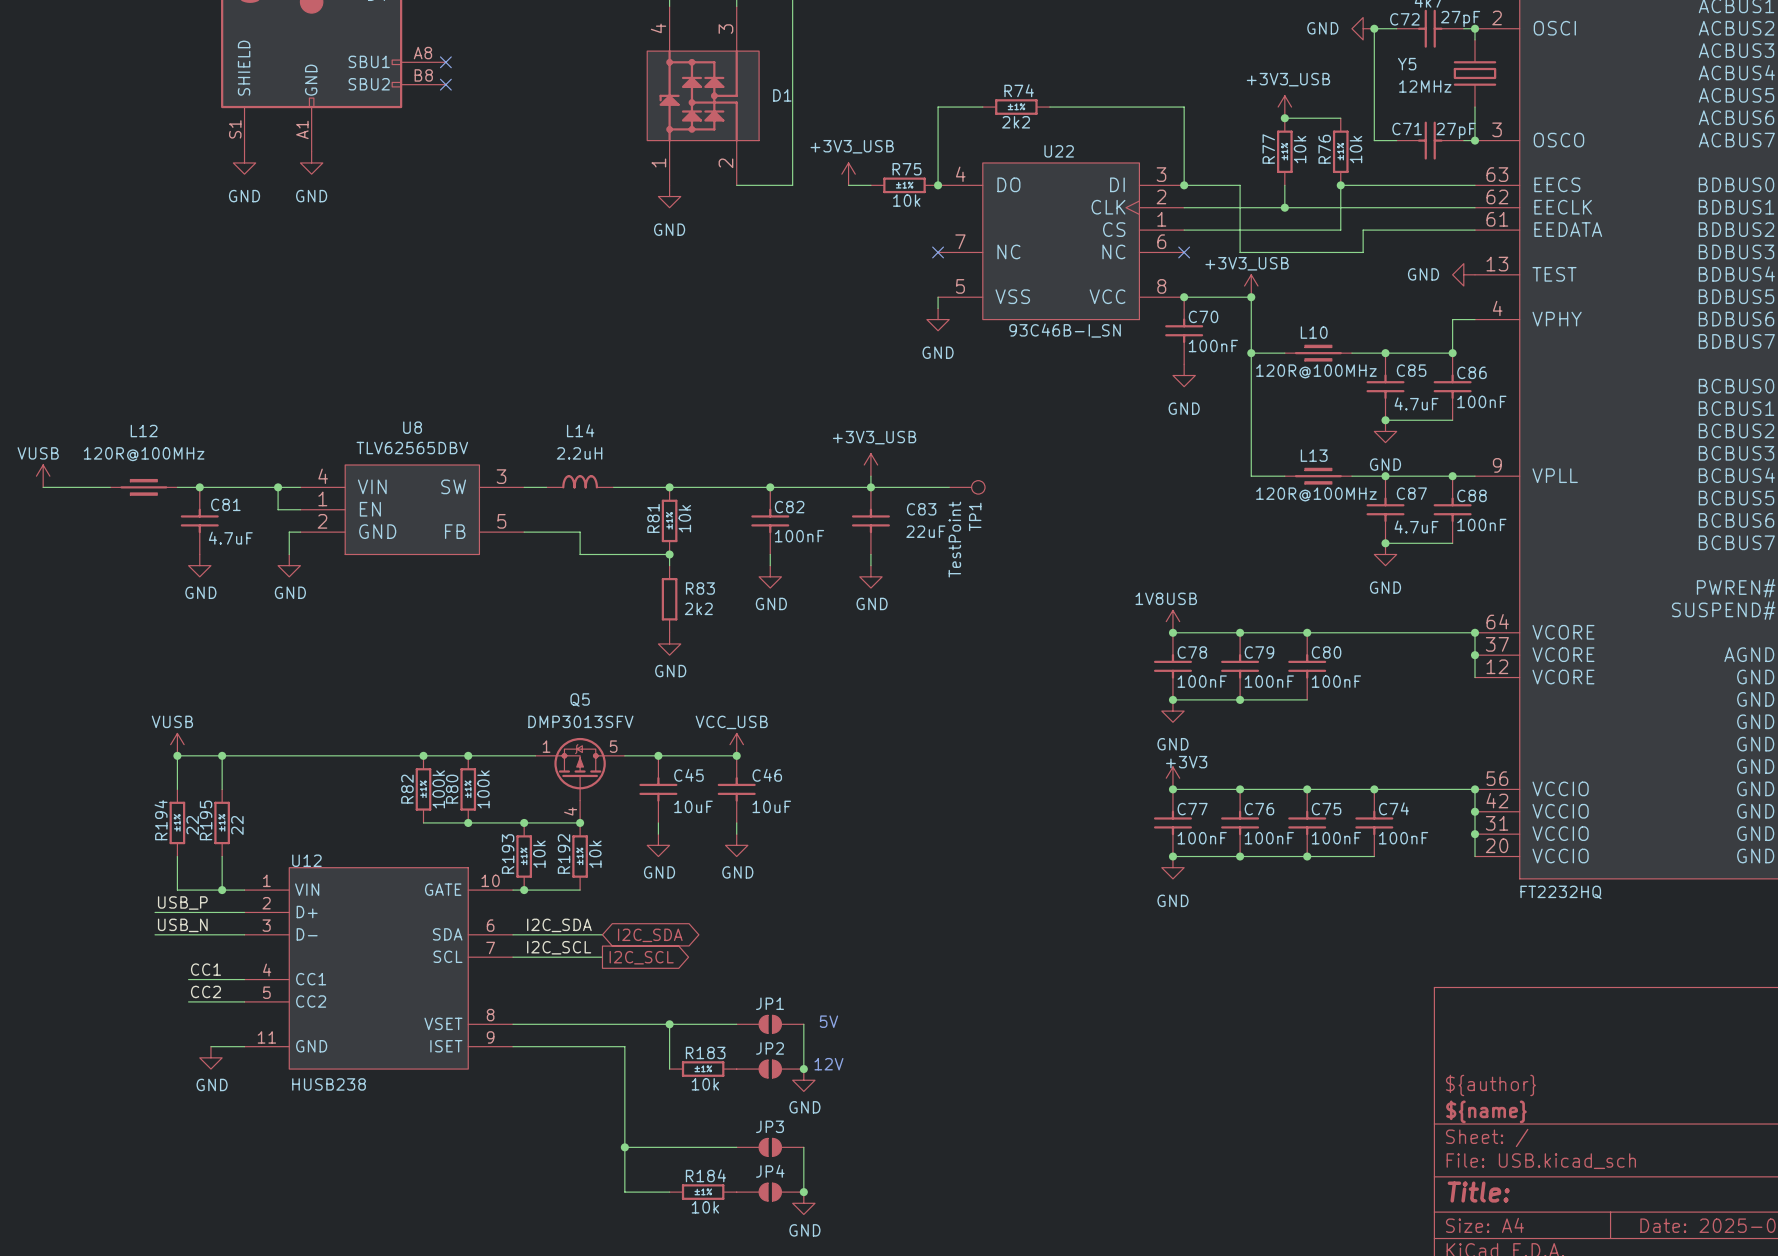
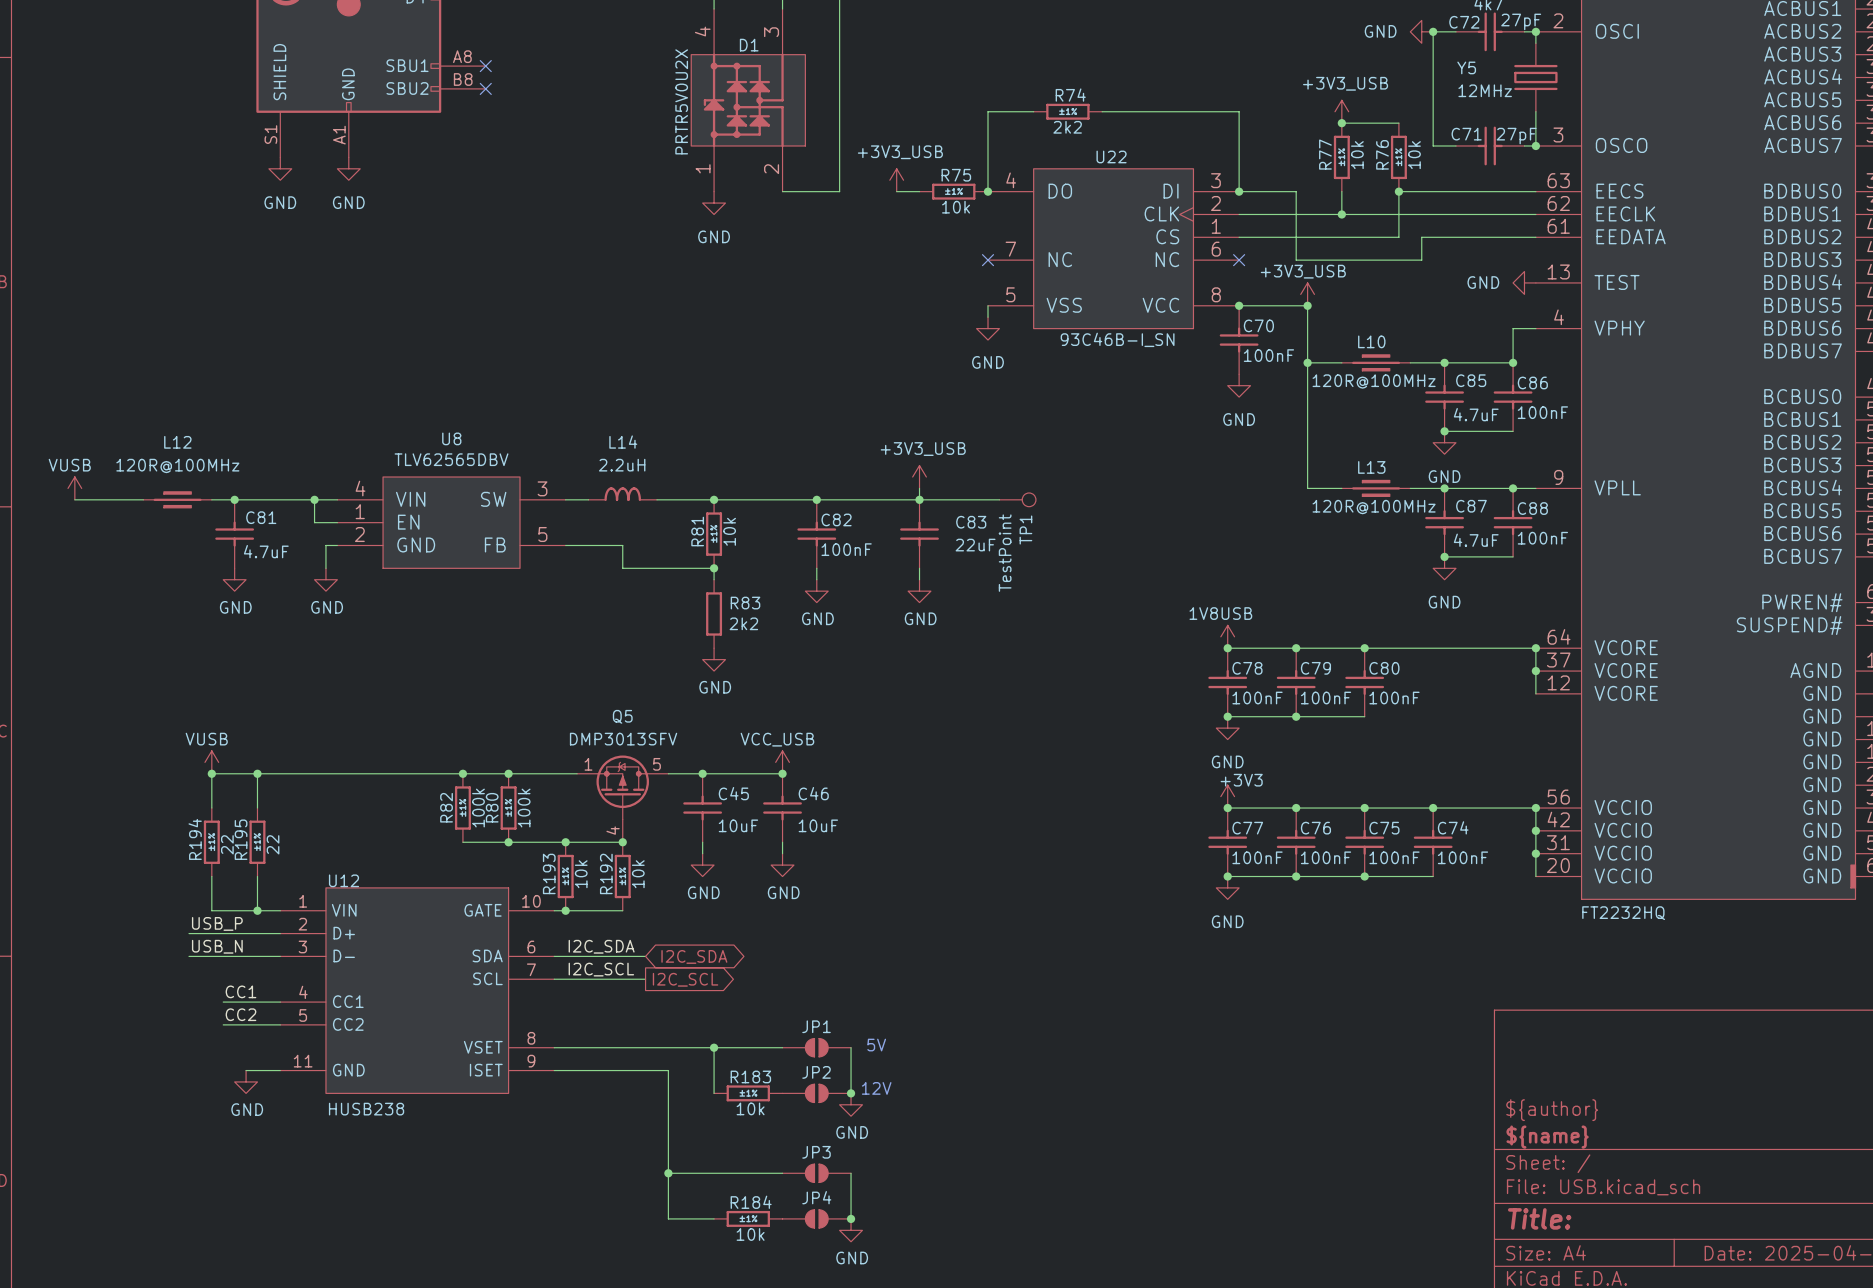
D1 name position: D1 (782, 95) -> D1 (749, 45)
D1 value: none -> PRTR5V0U2X (681, 101)

